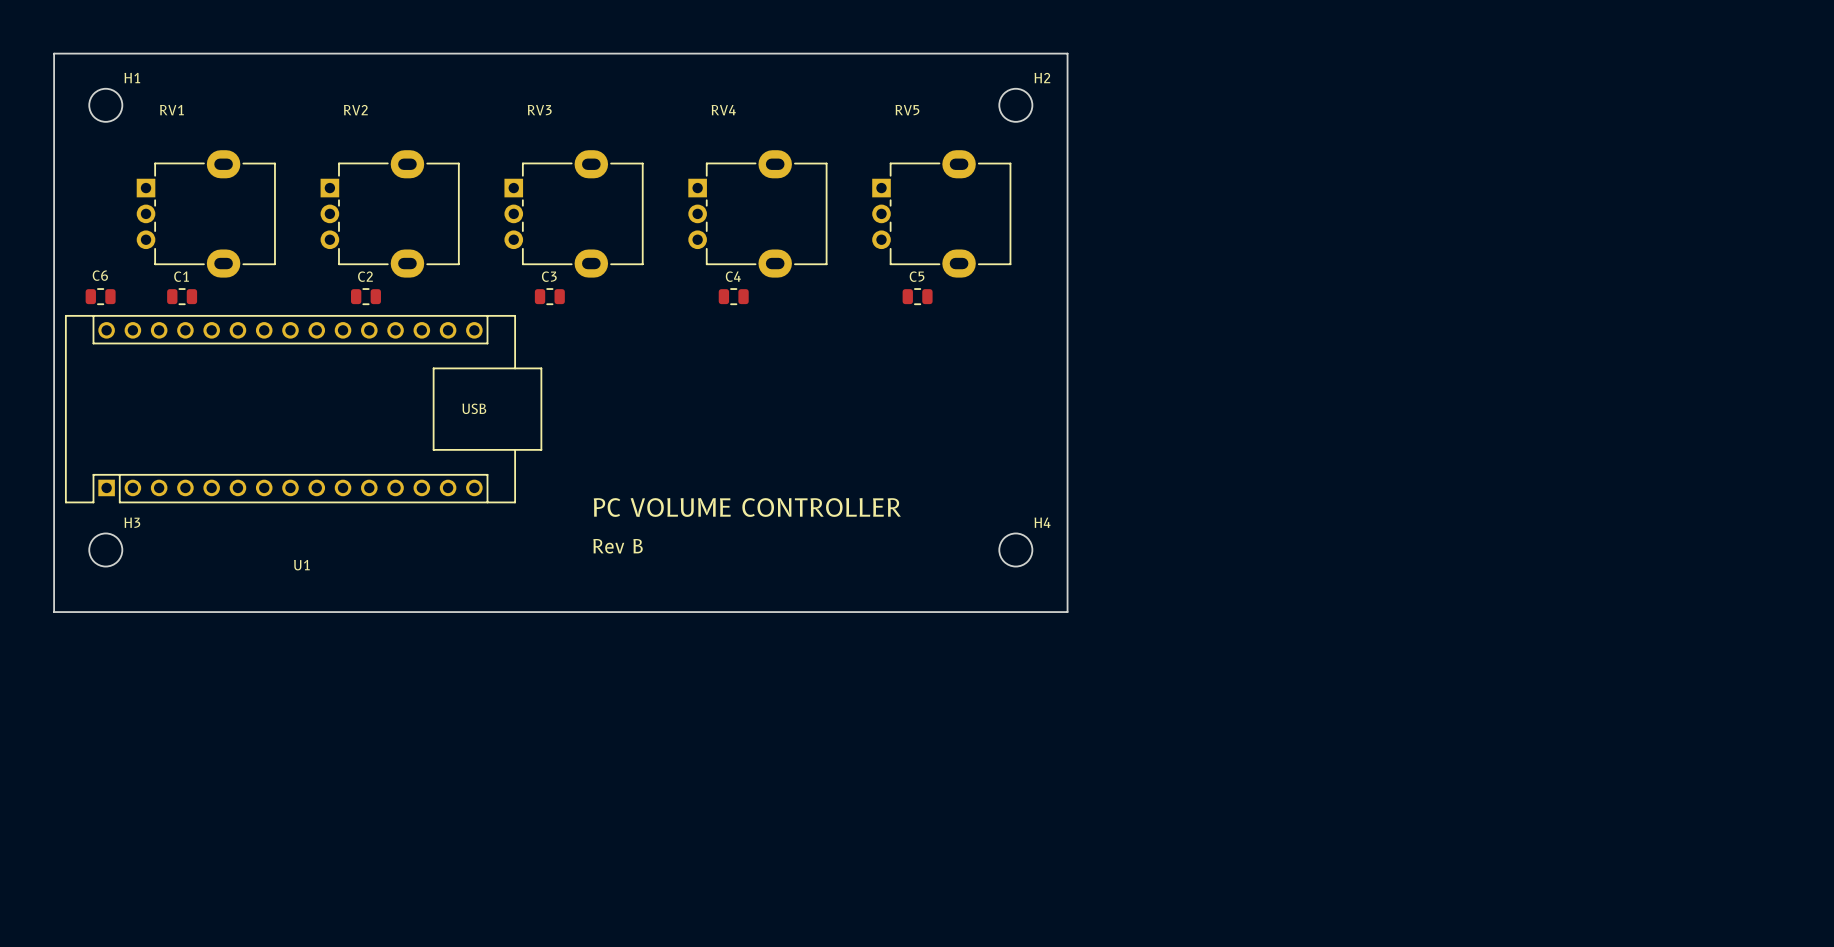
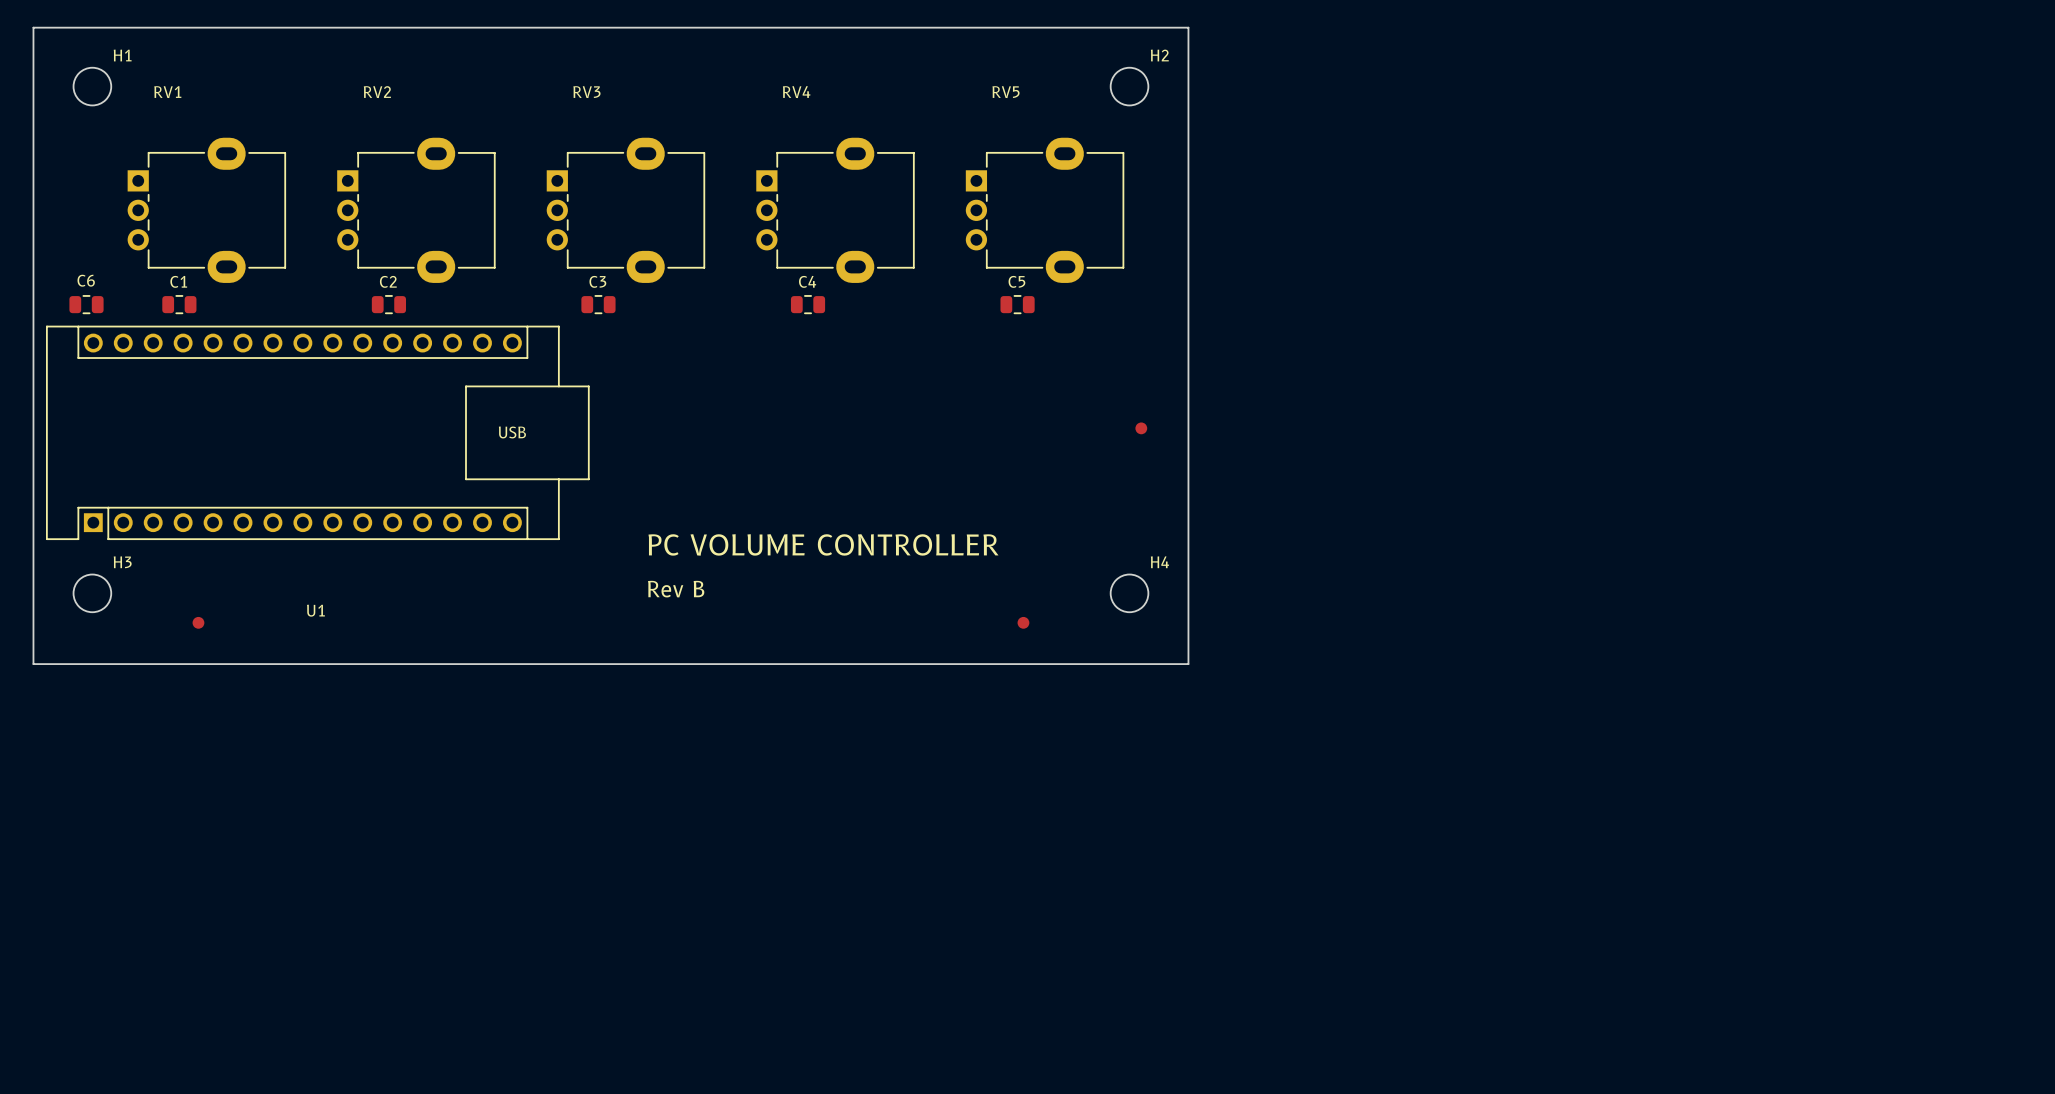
part: none -> (1141, 428)
part: none -> (198, 622)
part: none -> (1023, 622)

